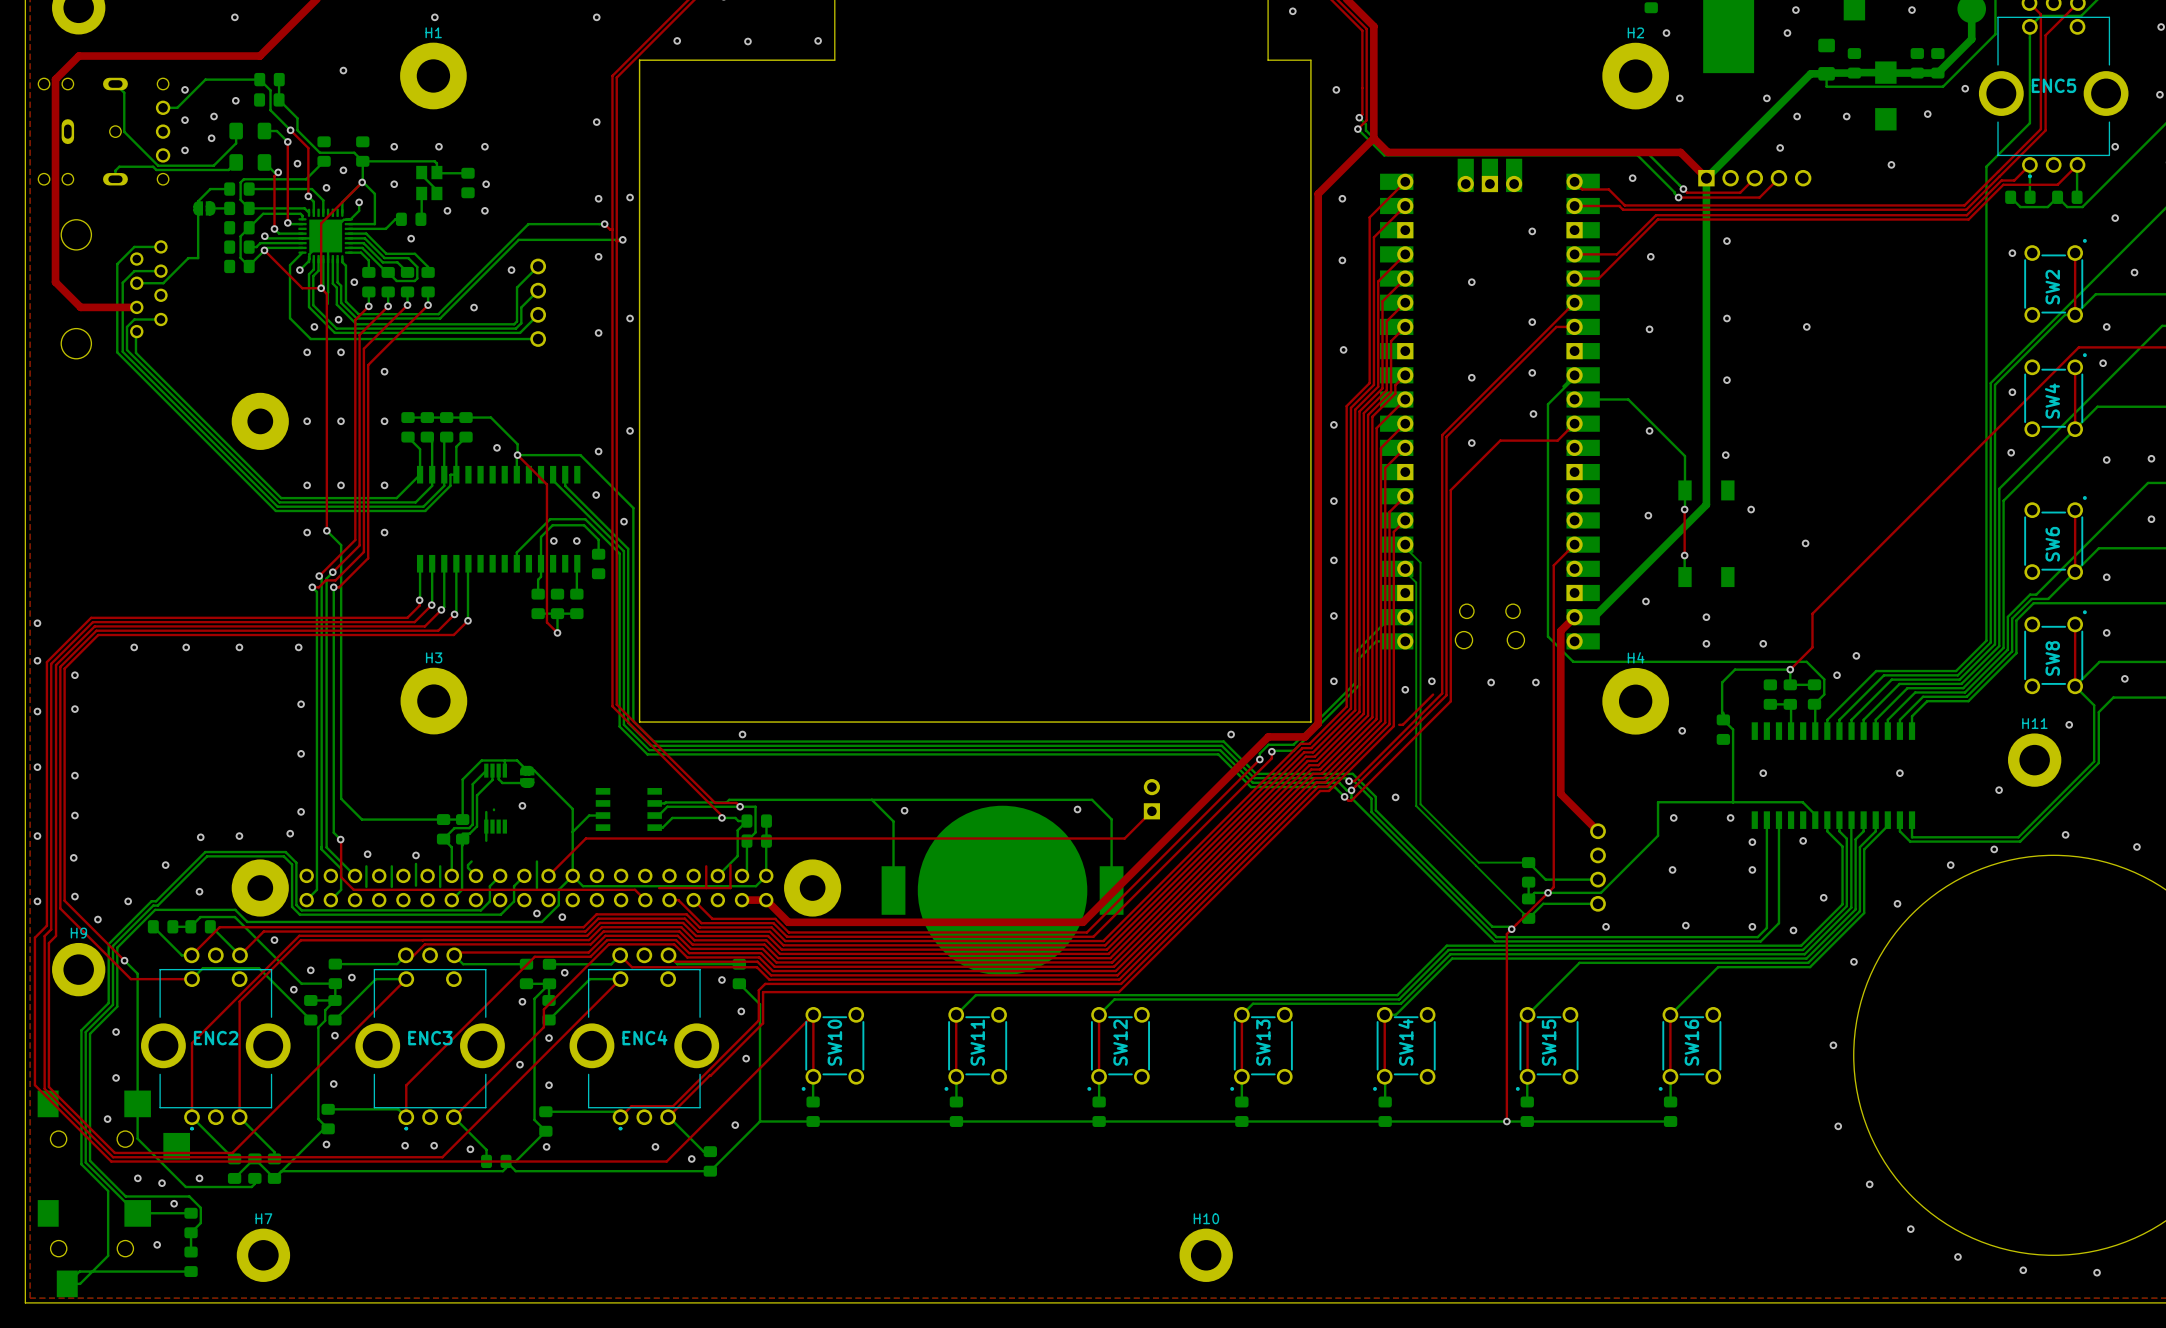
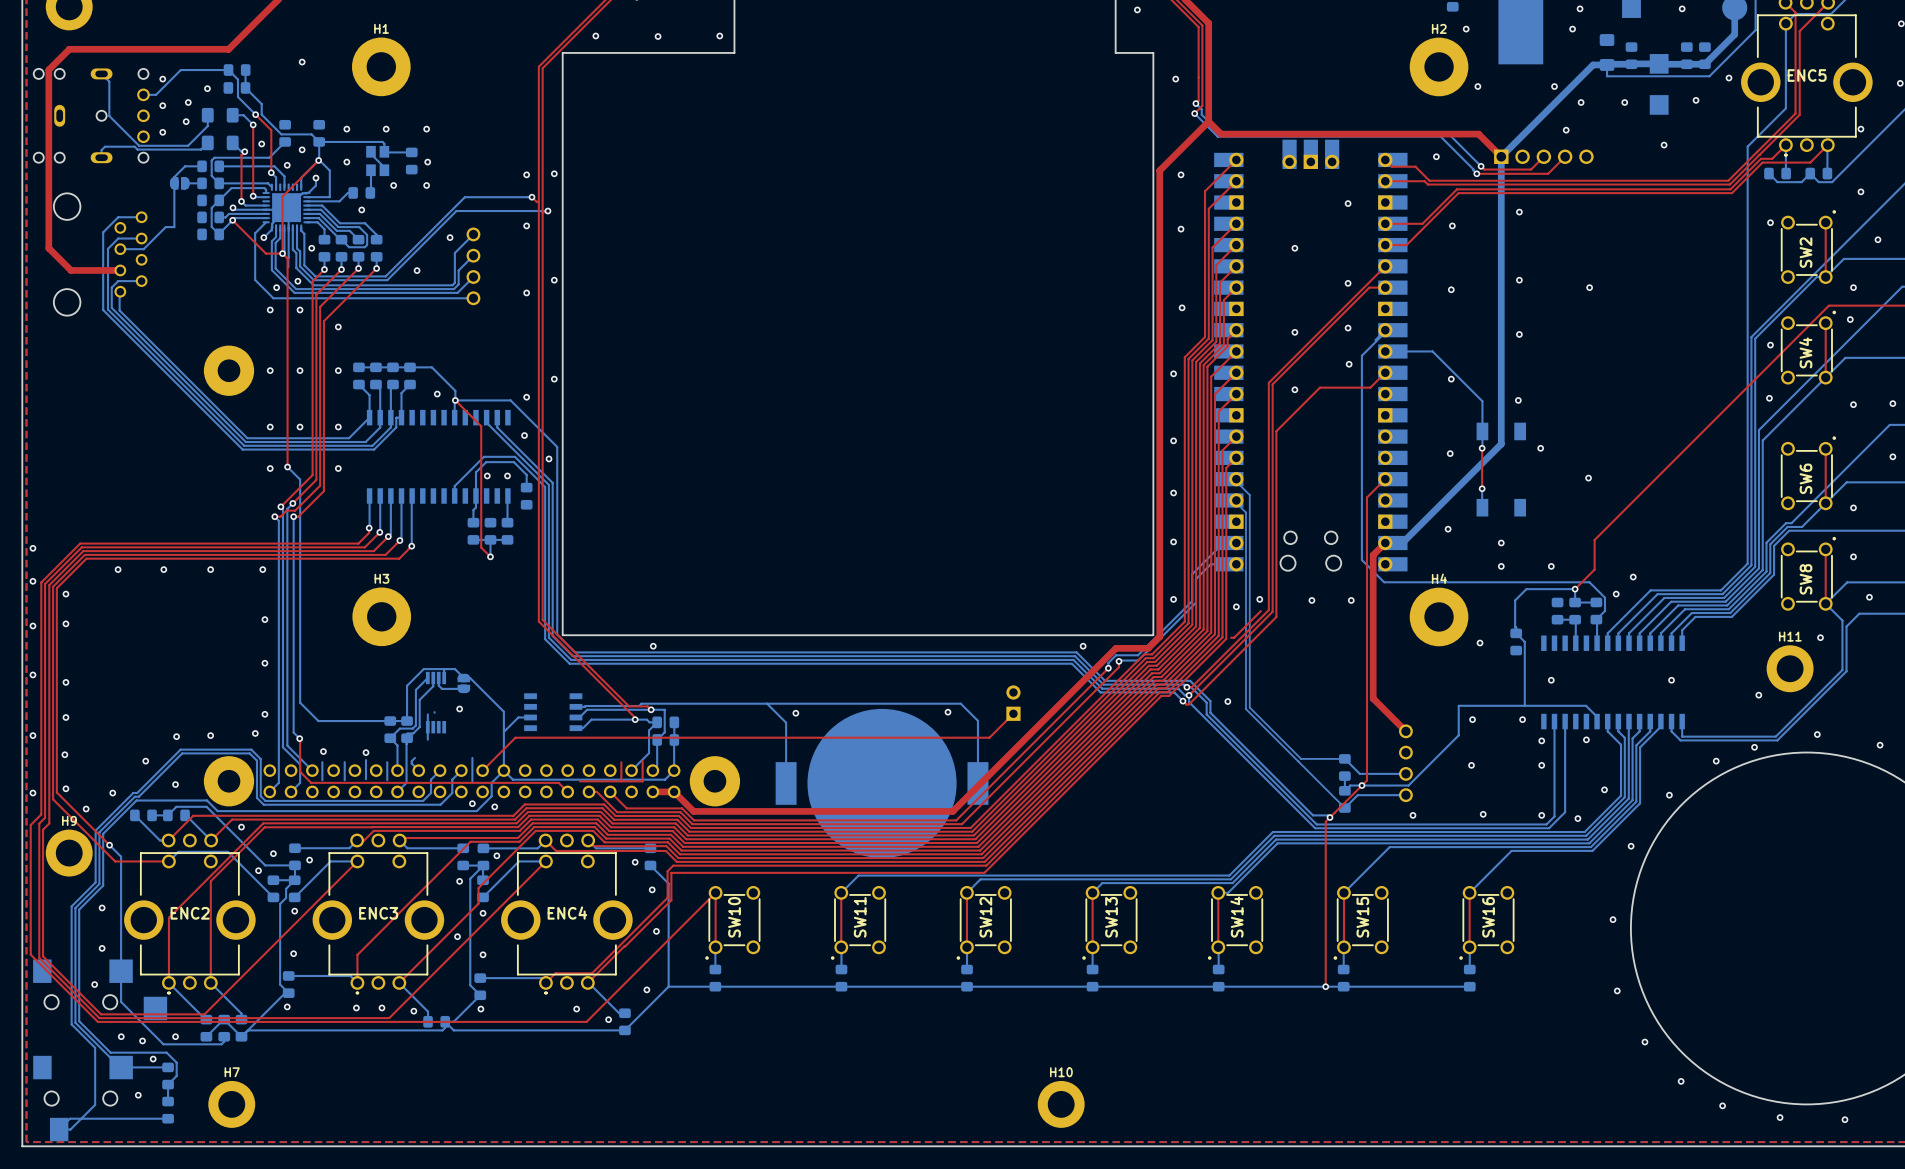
via: (234, 17) -> none
via: (434, 17) -> none
via: (596, 17) -> none
via: (596, 122) -> none

